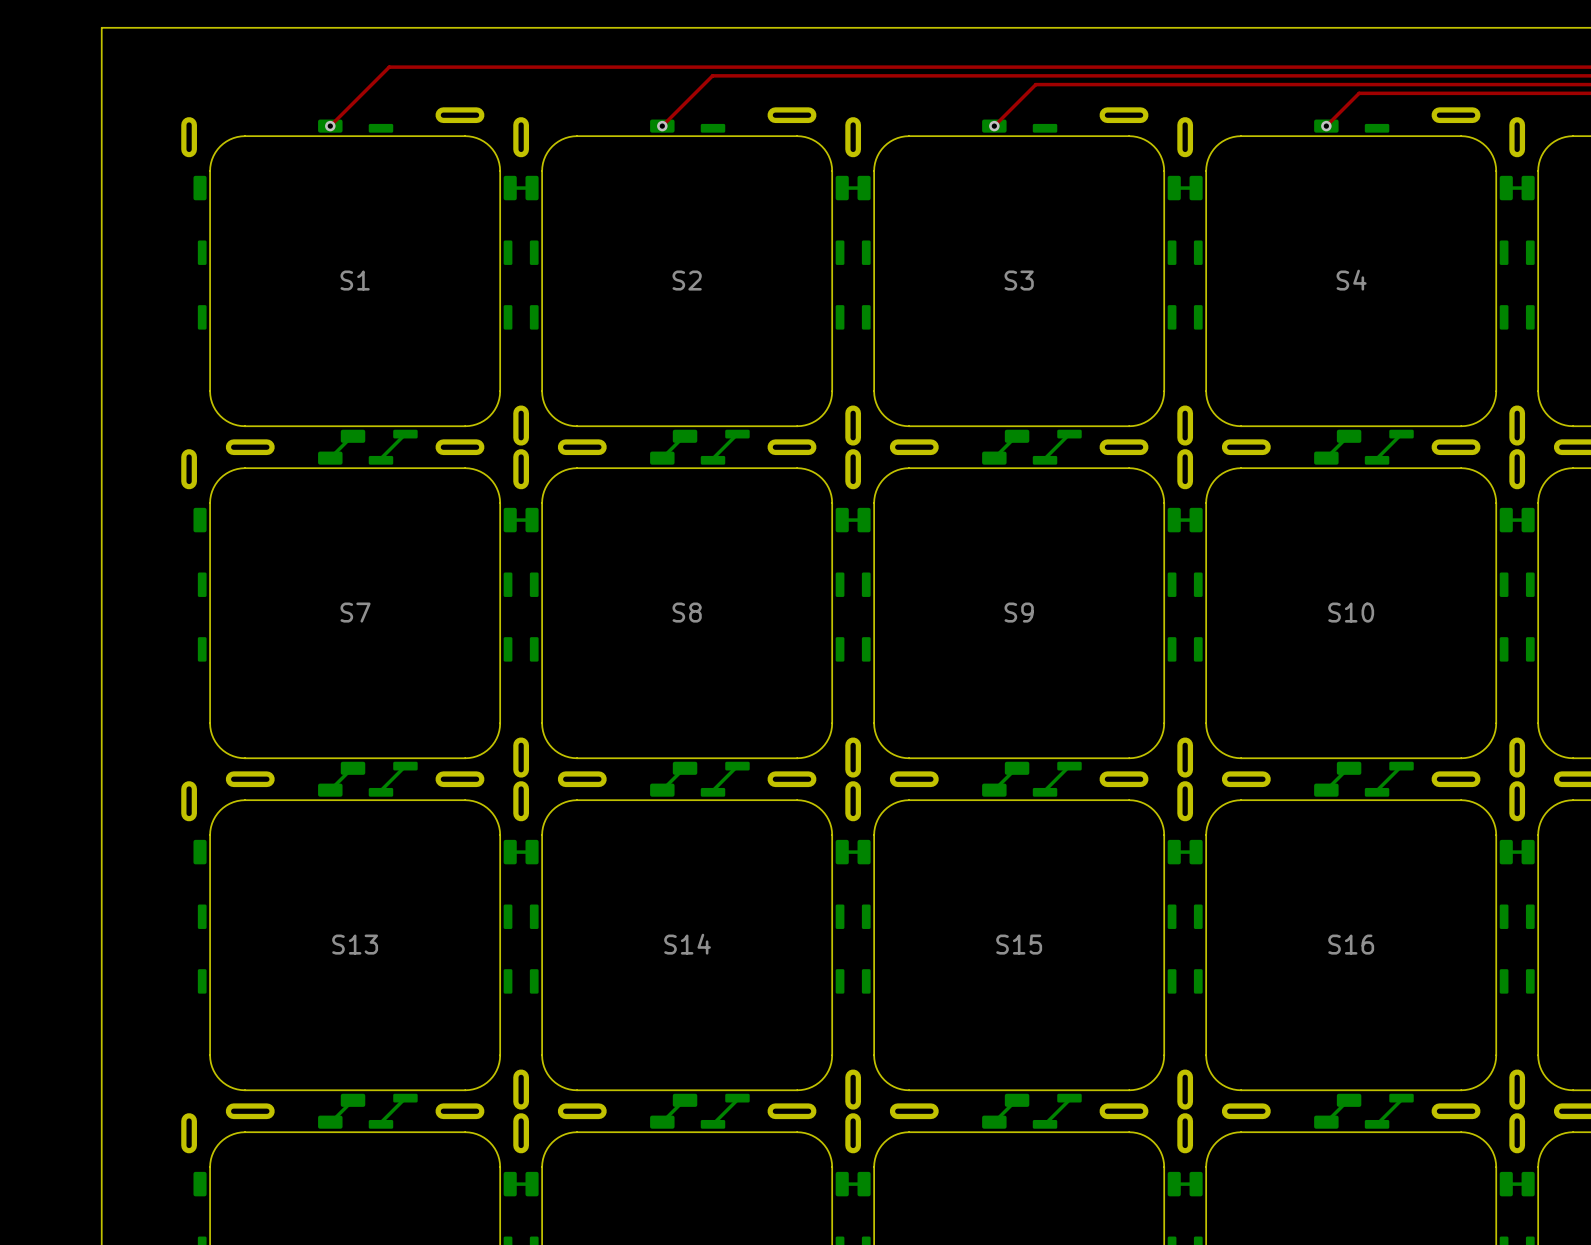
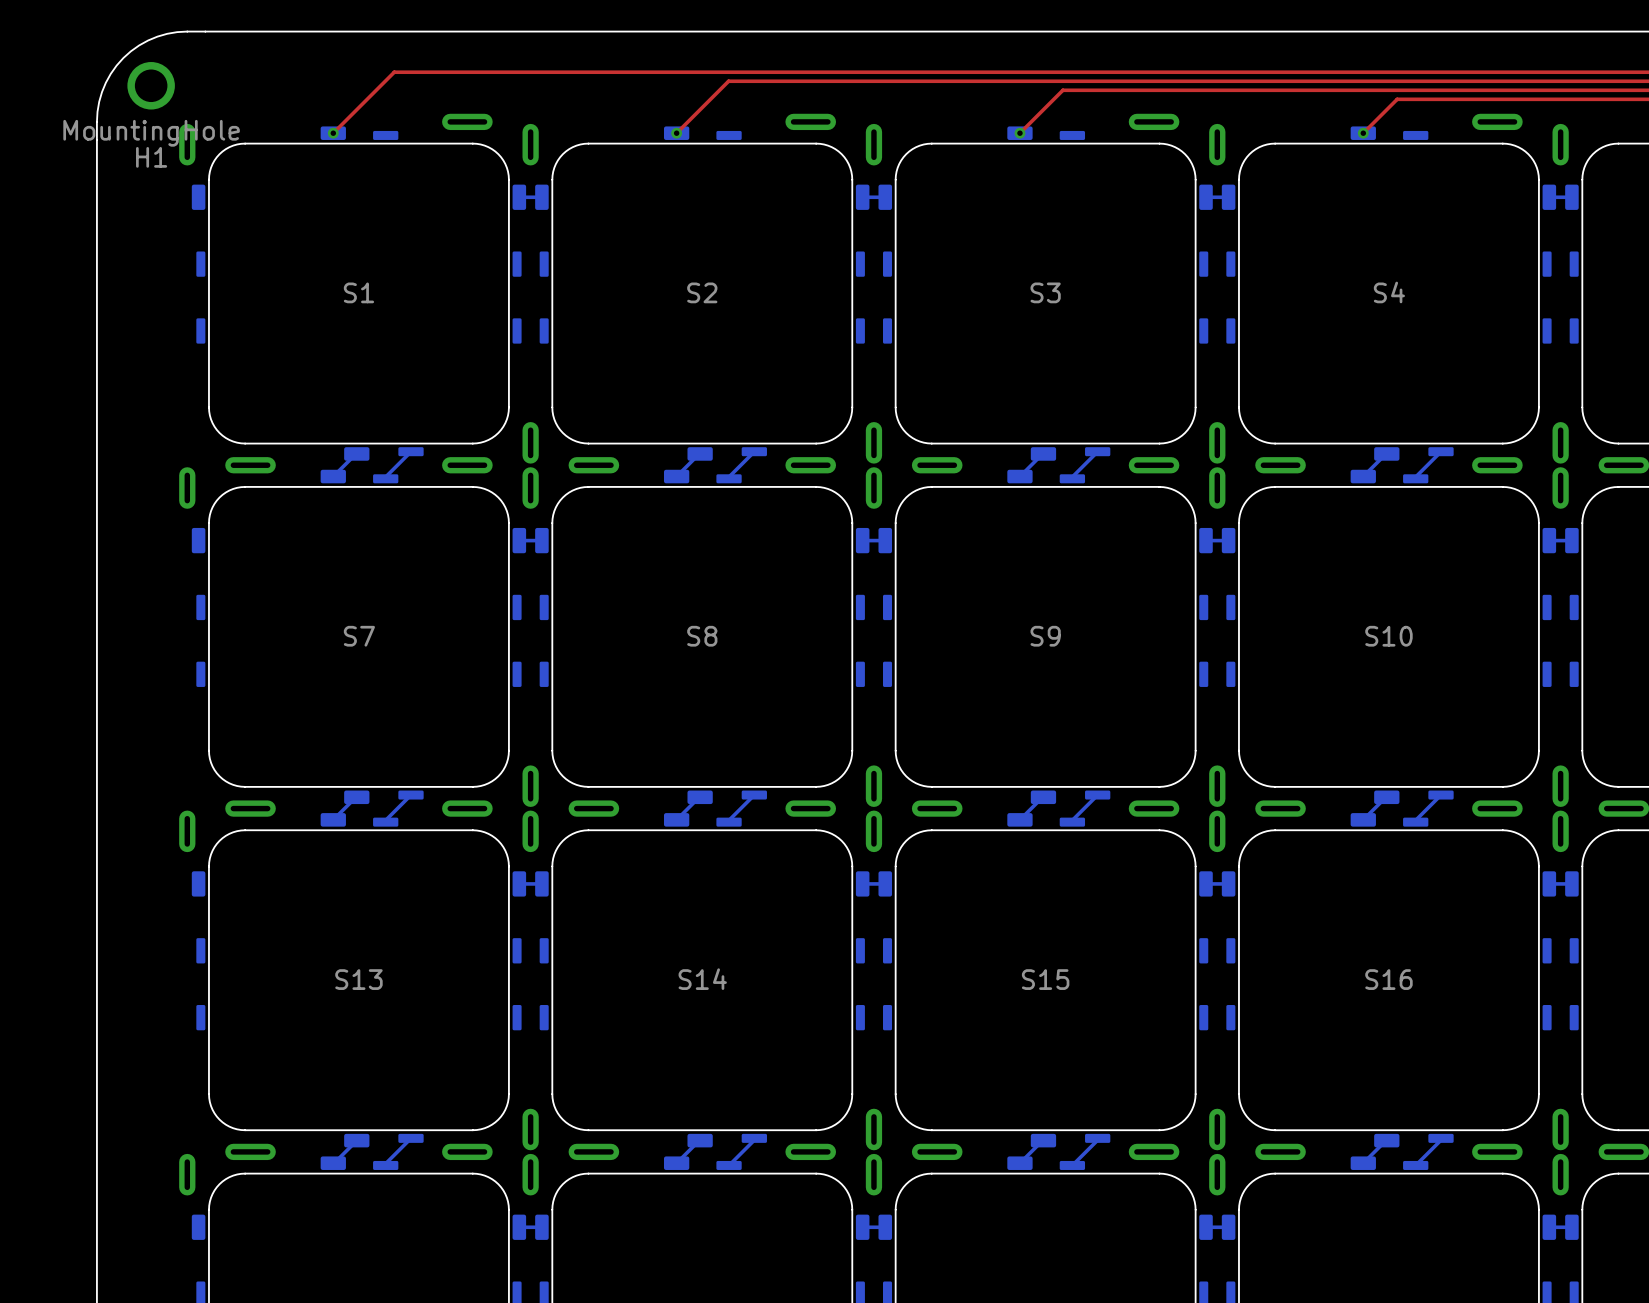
board edge: (189, 27) (101, 27) (101, 115) -> (187, 31) (167, 33) (148, 40) (123, 58) (110, 73) (102, 92) (96, 121)
H1: none -> MountingHole (151, 85)

